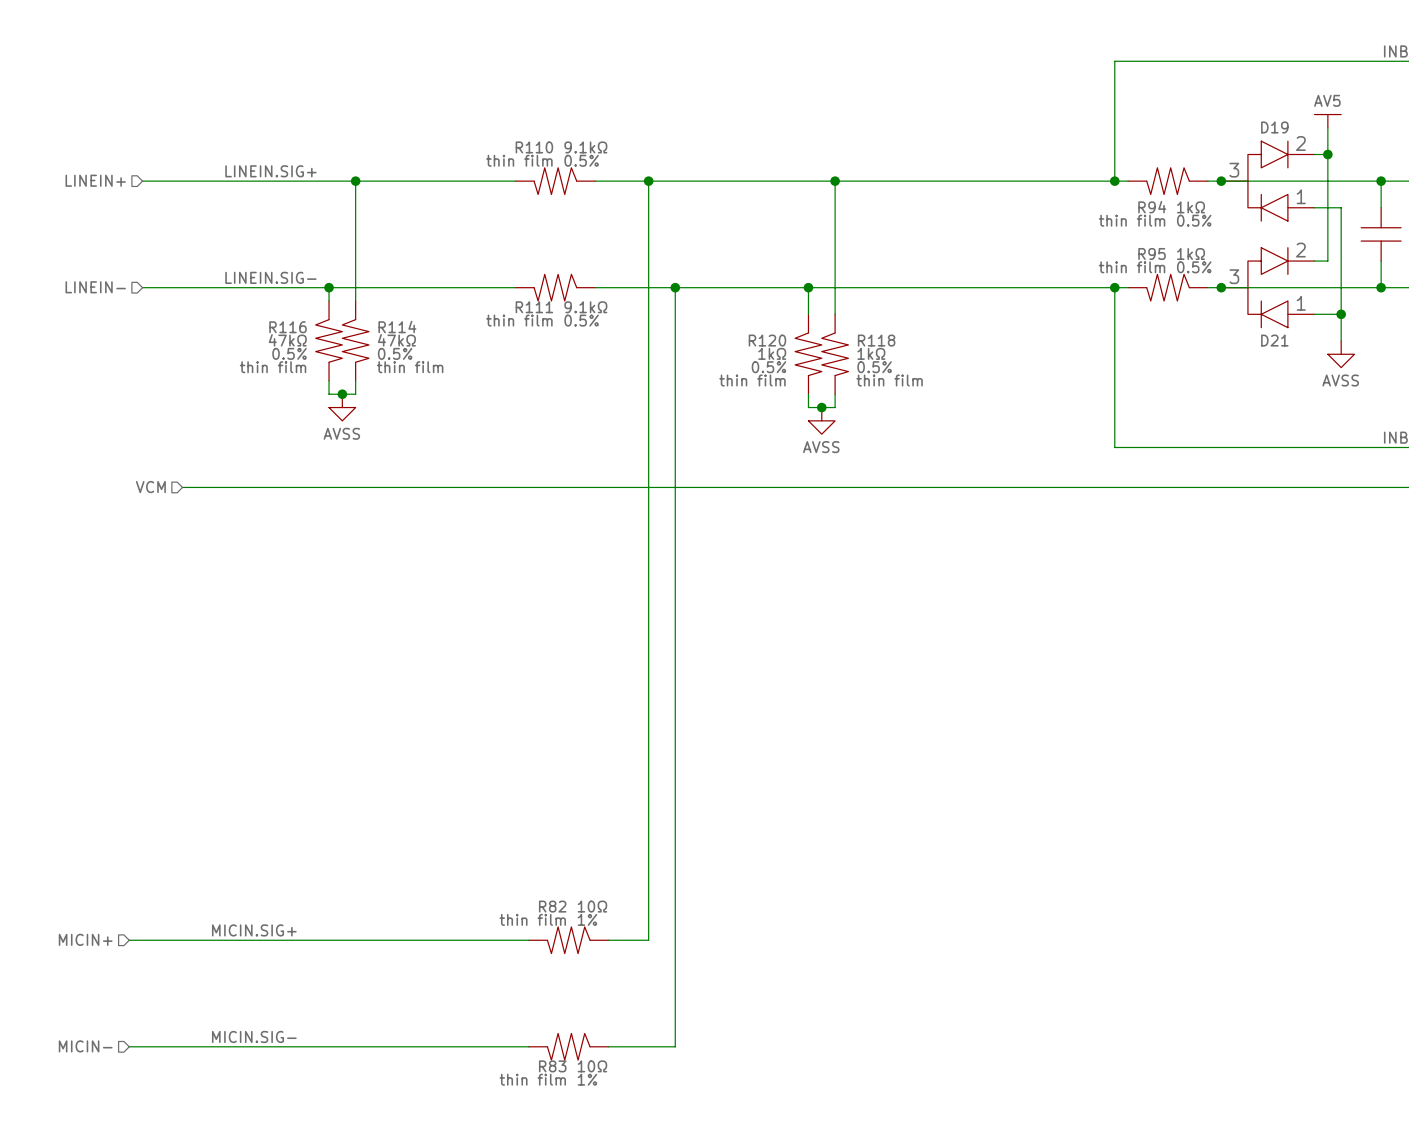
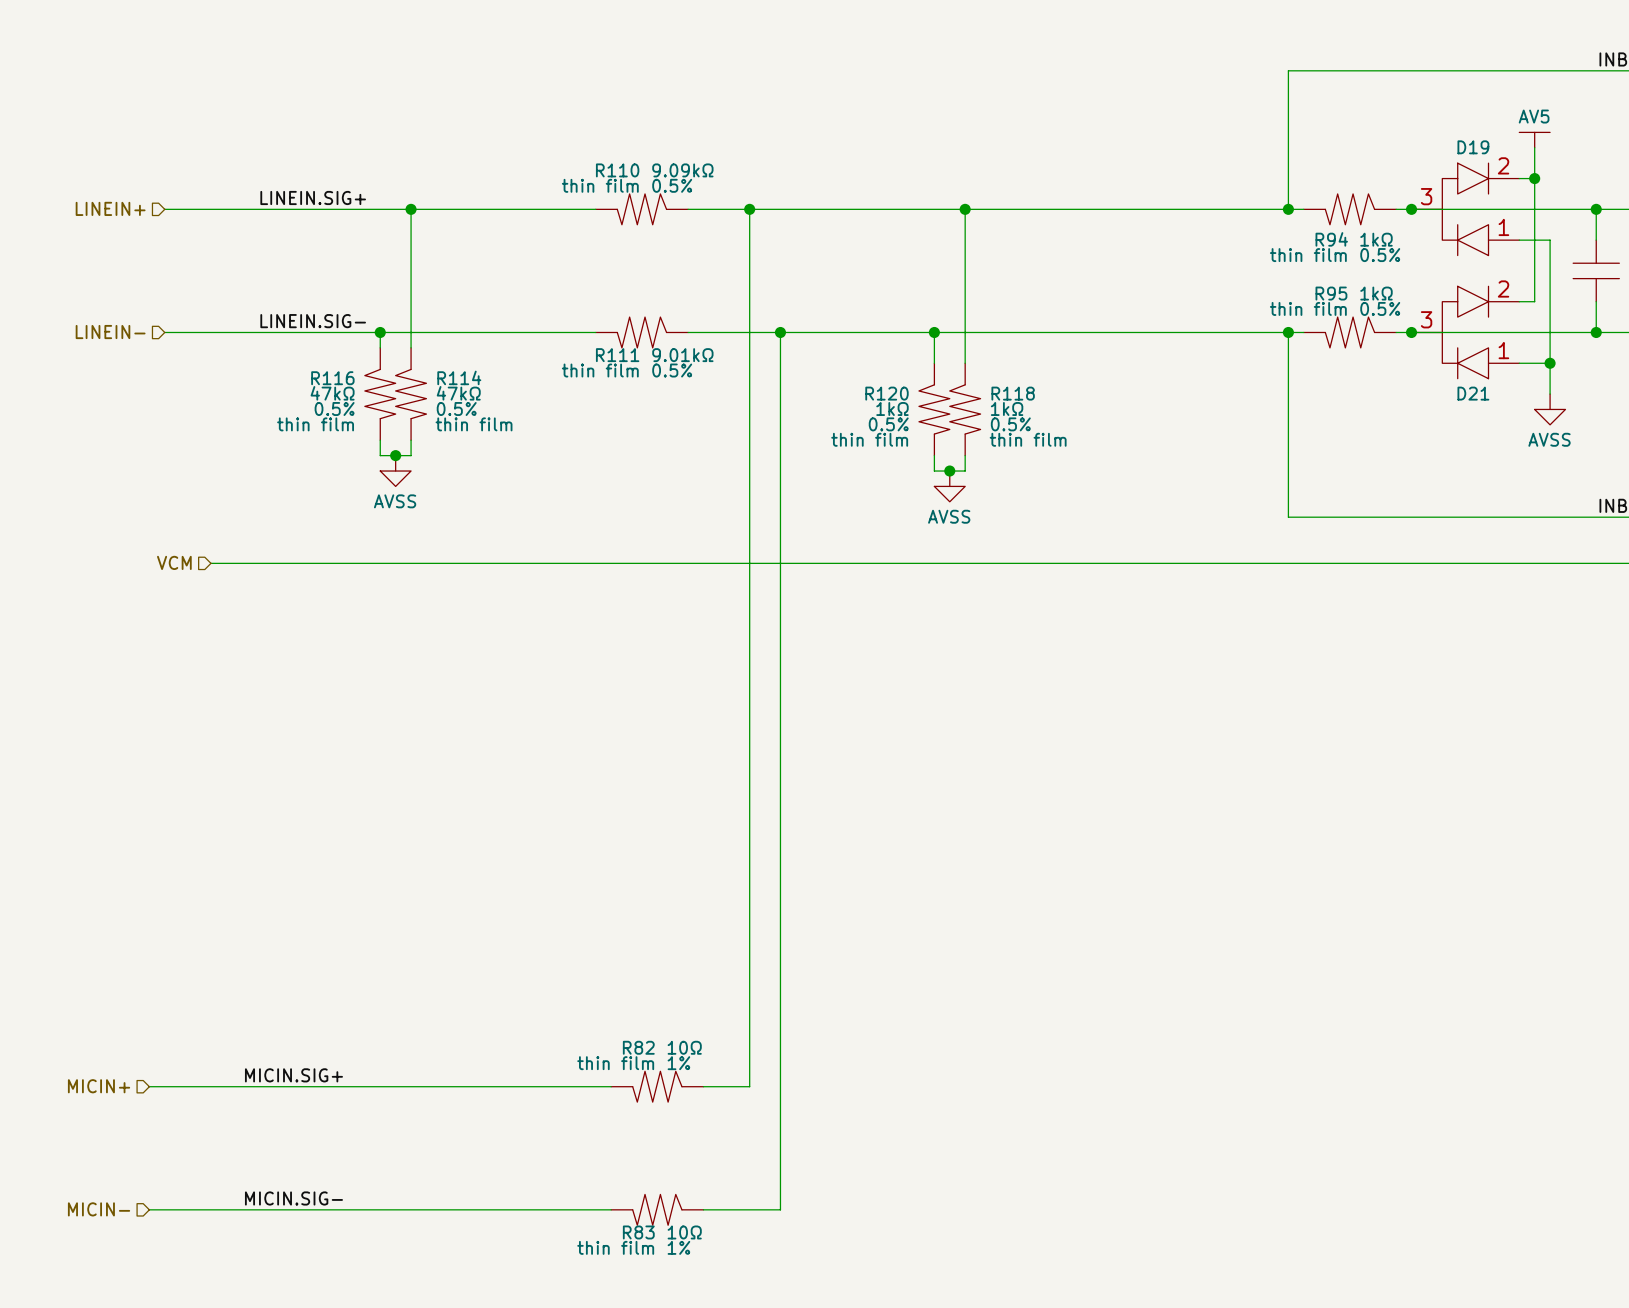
R110 text: 9.1kΩ (585, 147) -> 9.09kΩ (682, 170)
R111 text: 9.1kΩ (585, 307) -> 9.01kΩ (682, 355)

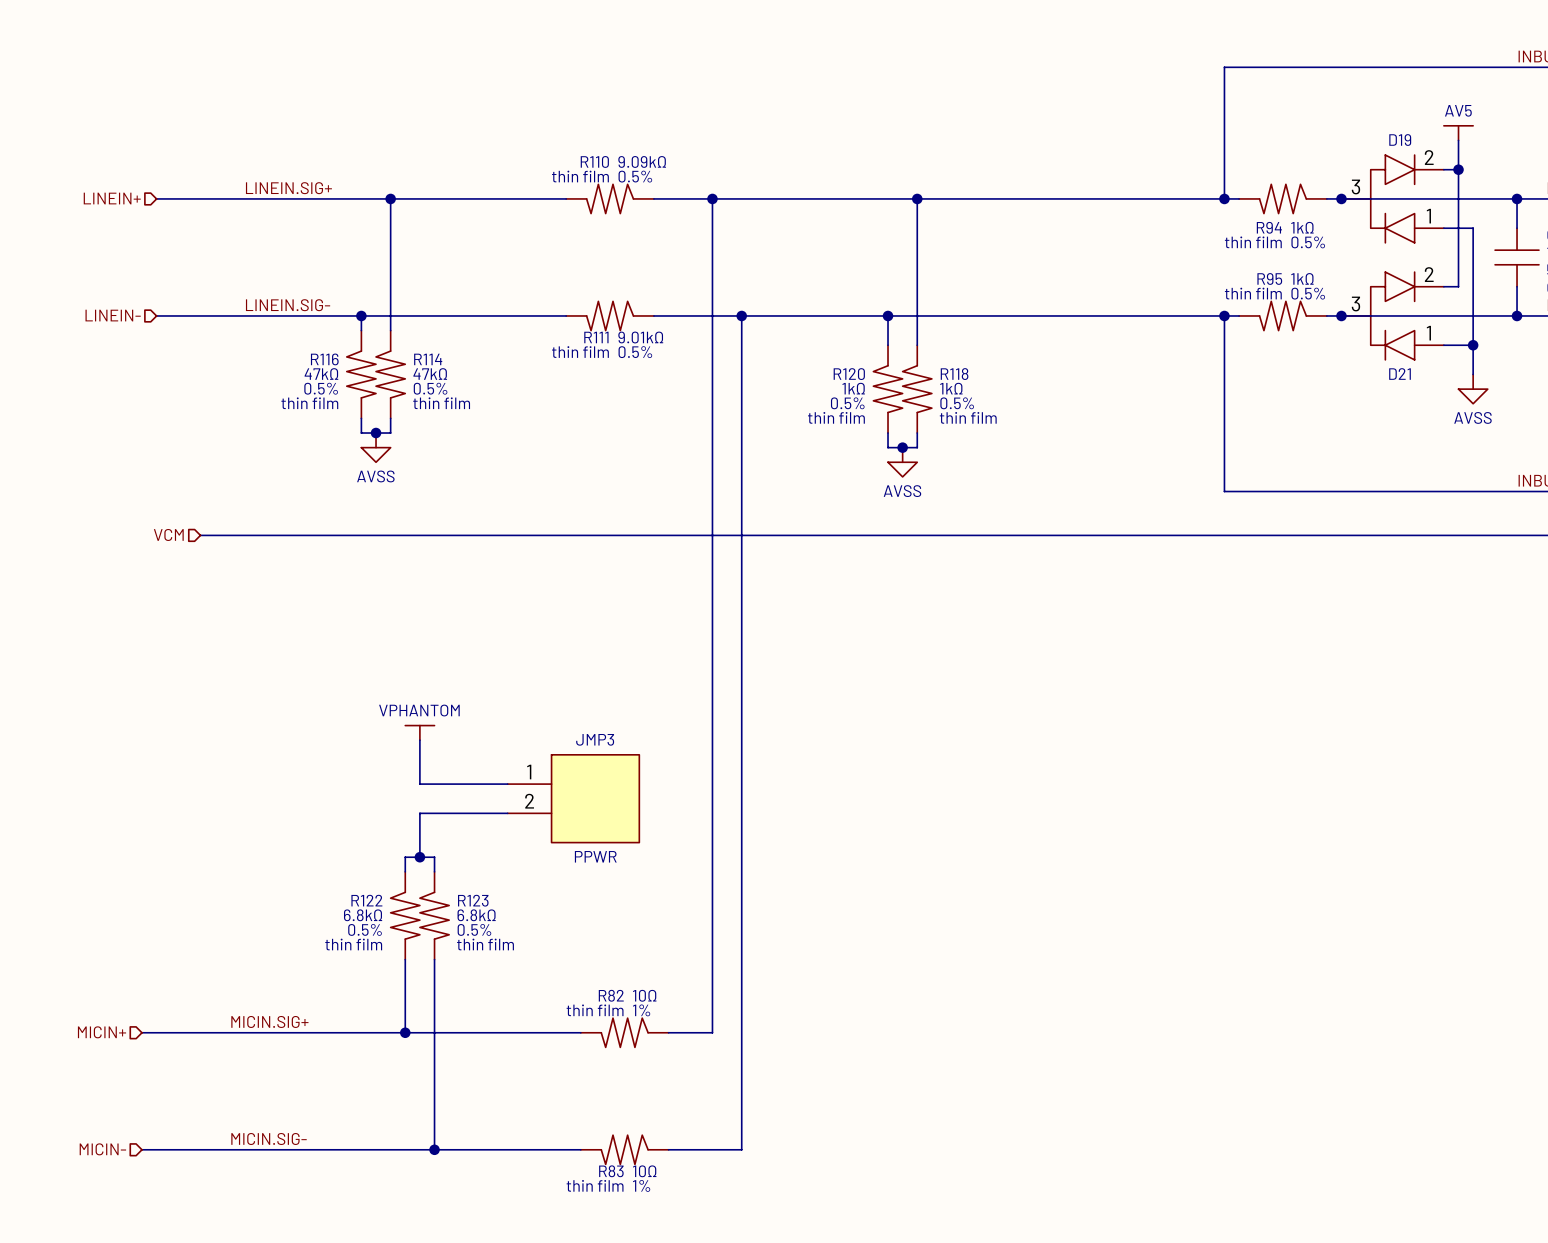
power symbol: none -> VPHANTOM (419, 732)
wire: none -> (419, 740) (419, 784) (507, 784)
JMP3: none -> PPWR (573, 798)
wire: none -> (507, 813) (419, 813) (419, 857)
junction: none -> (419, 857)
wire: none -> (405, 871) (405, 857) (434, 857) (434, 871)
R122: none -> (405, 915)
R123: none -> (434, 915)
wire: none -> (405, 959) (405, 1032)
wire: none -> (434, 959) (434, 1149)
junction: none -> (405, 1032)
junction: none -> (434, 1149)

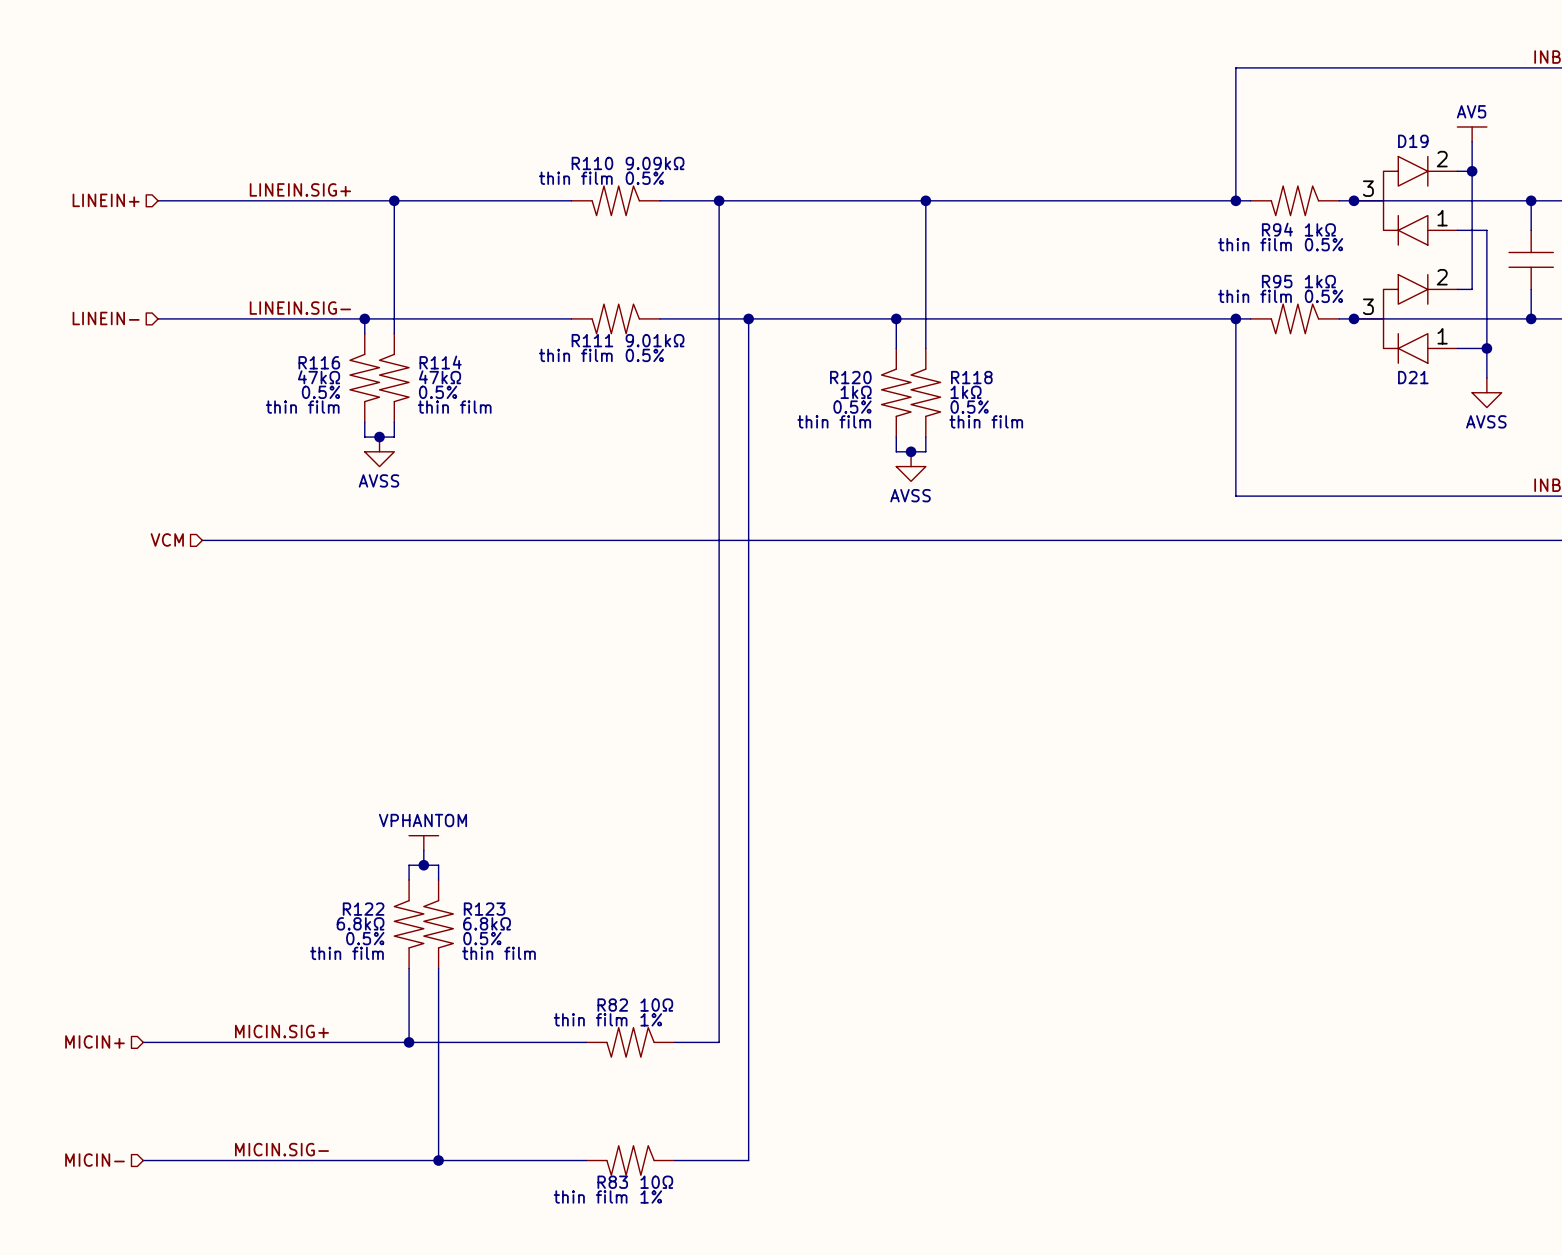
power symbol position: VPHANTOM (419, 732) -> VPHANTOM (423, 843)
wire: (419, 740) (419, 784) (507, 784) -> none
JMP3: PPWR (573, 798) -> none
wire: (507, 813) (419, 813) (419, 842) -> none

